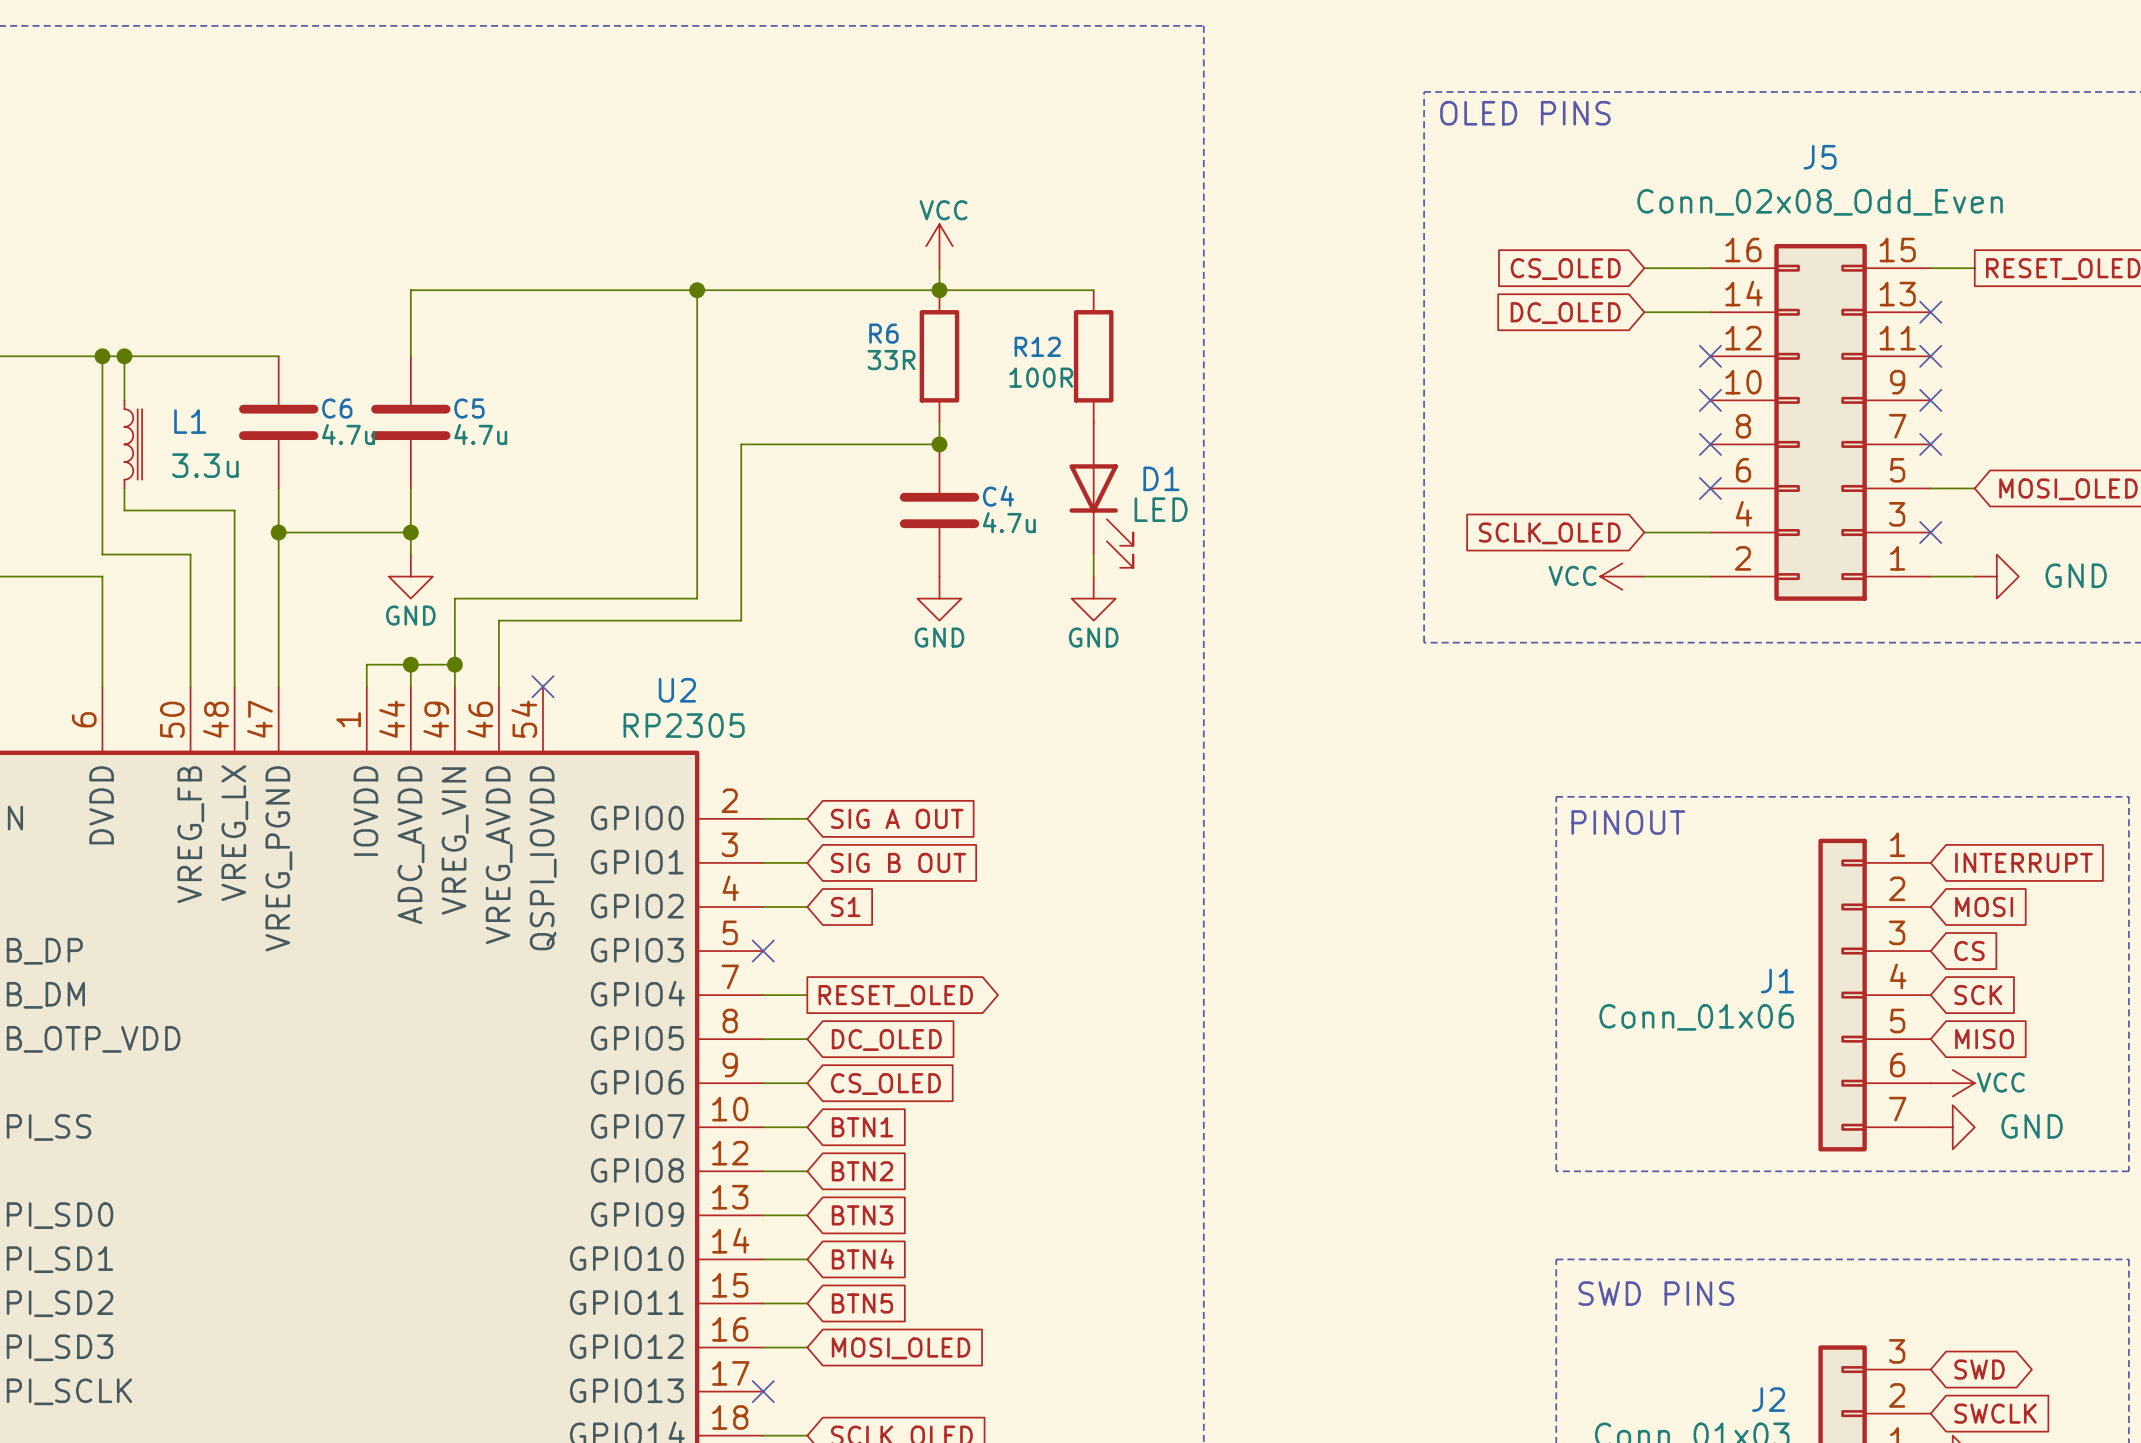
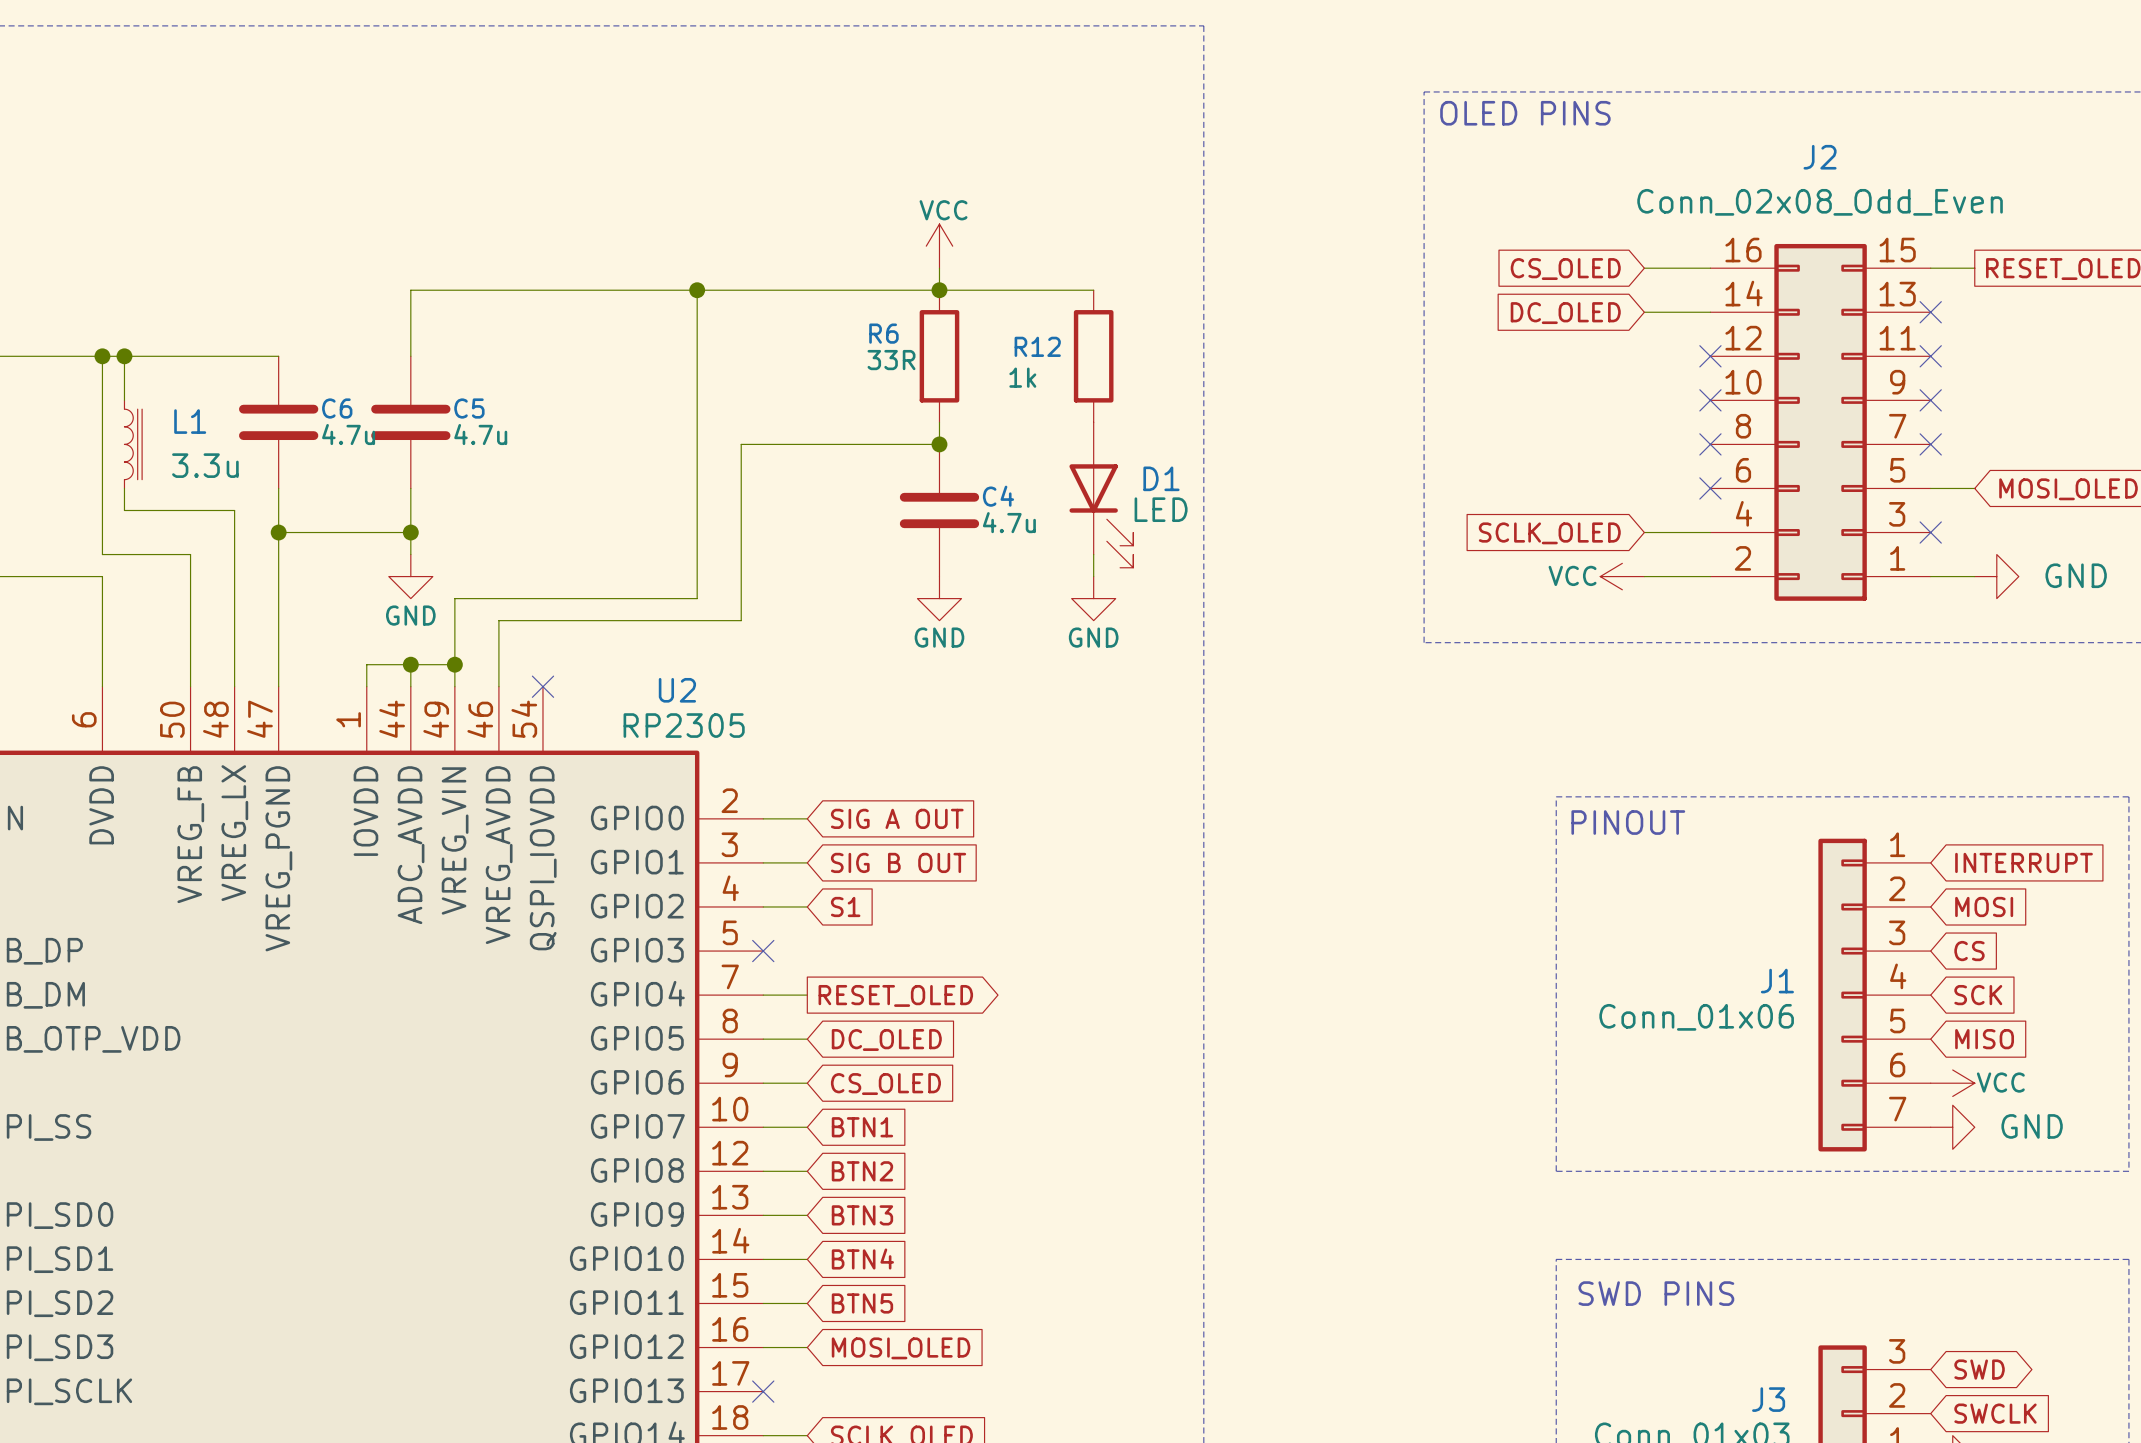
J5 name: J5 (1820, 157) -> J2 (1820, 157)
R12 value: 100R (1041, 377) -> 1k (1022, 377)
J2 name: J2 (1768, 1399) -> J3 (1768, 1399)

